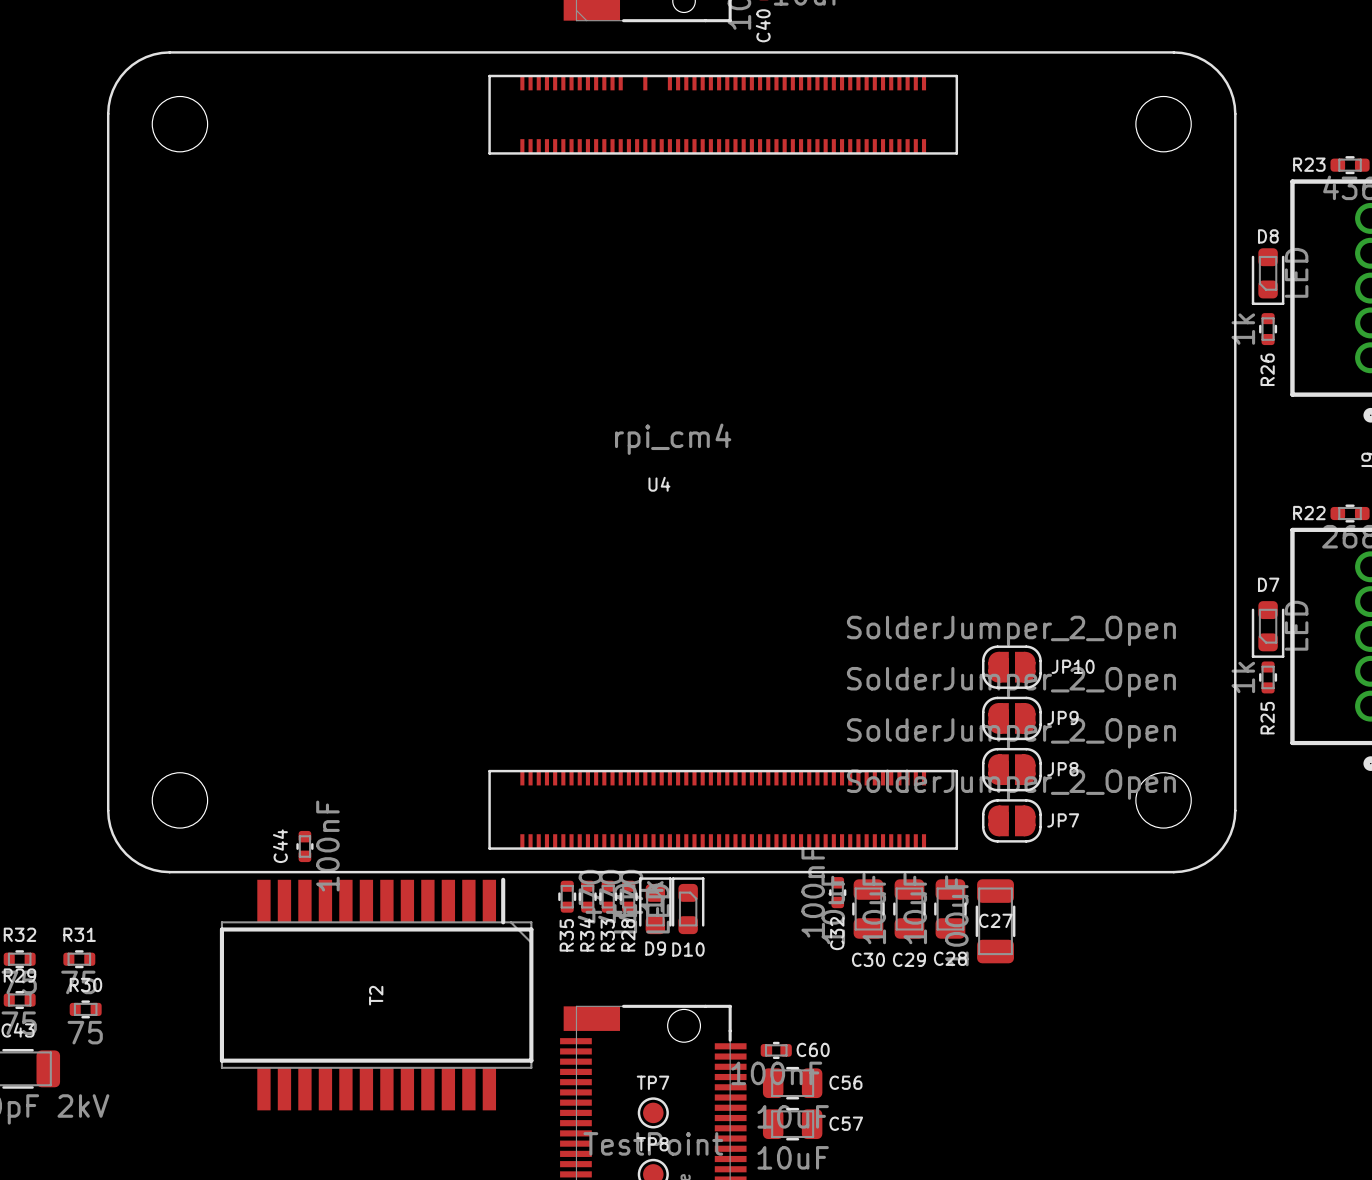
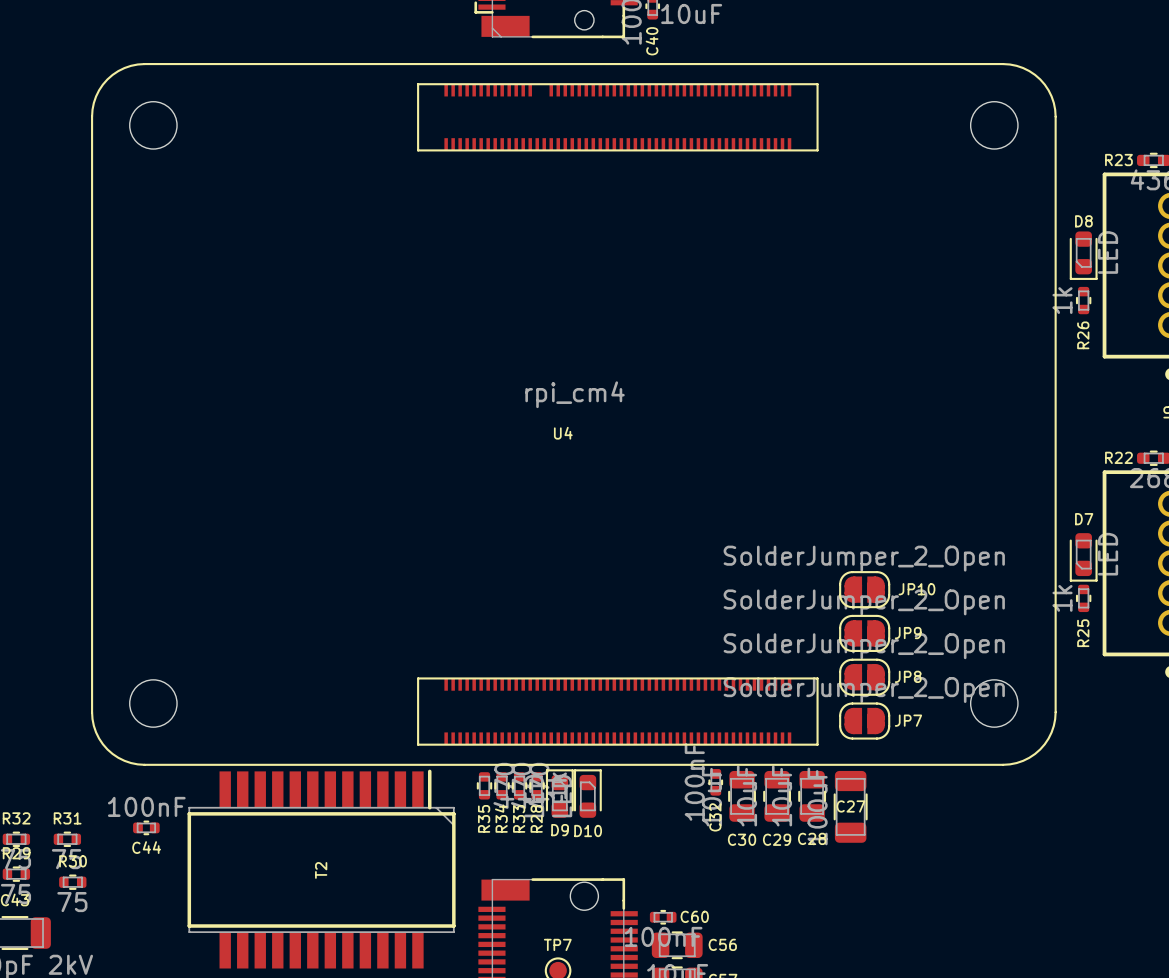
U4 footprint: [106, 51, 1237, 874] -> [91, 62, 1057, 766]
C44 rotation: 0° (304, 846) -> 90° clockwise (146, 827)
C44 position: (304, 846) -> (146, 827)

